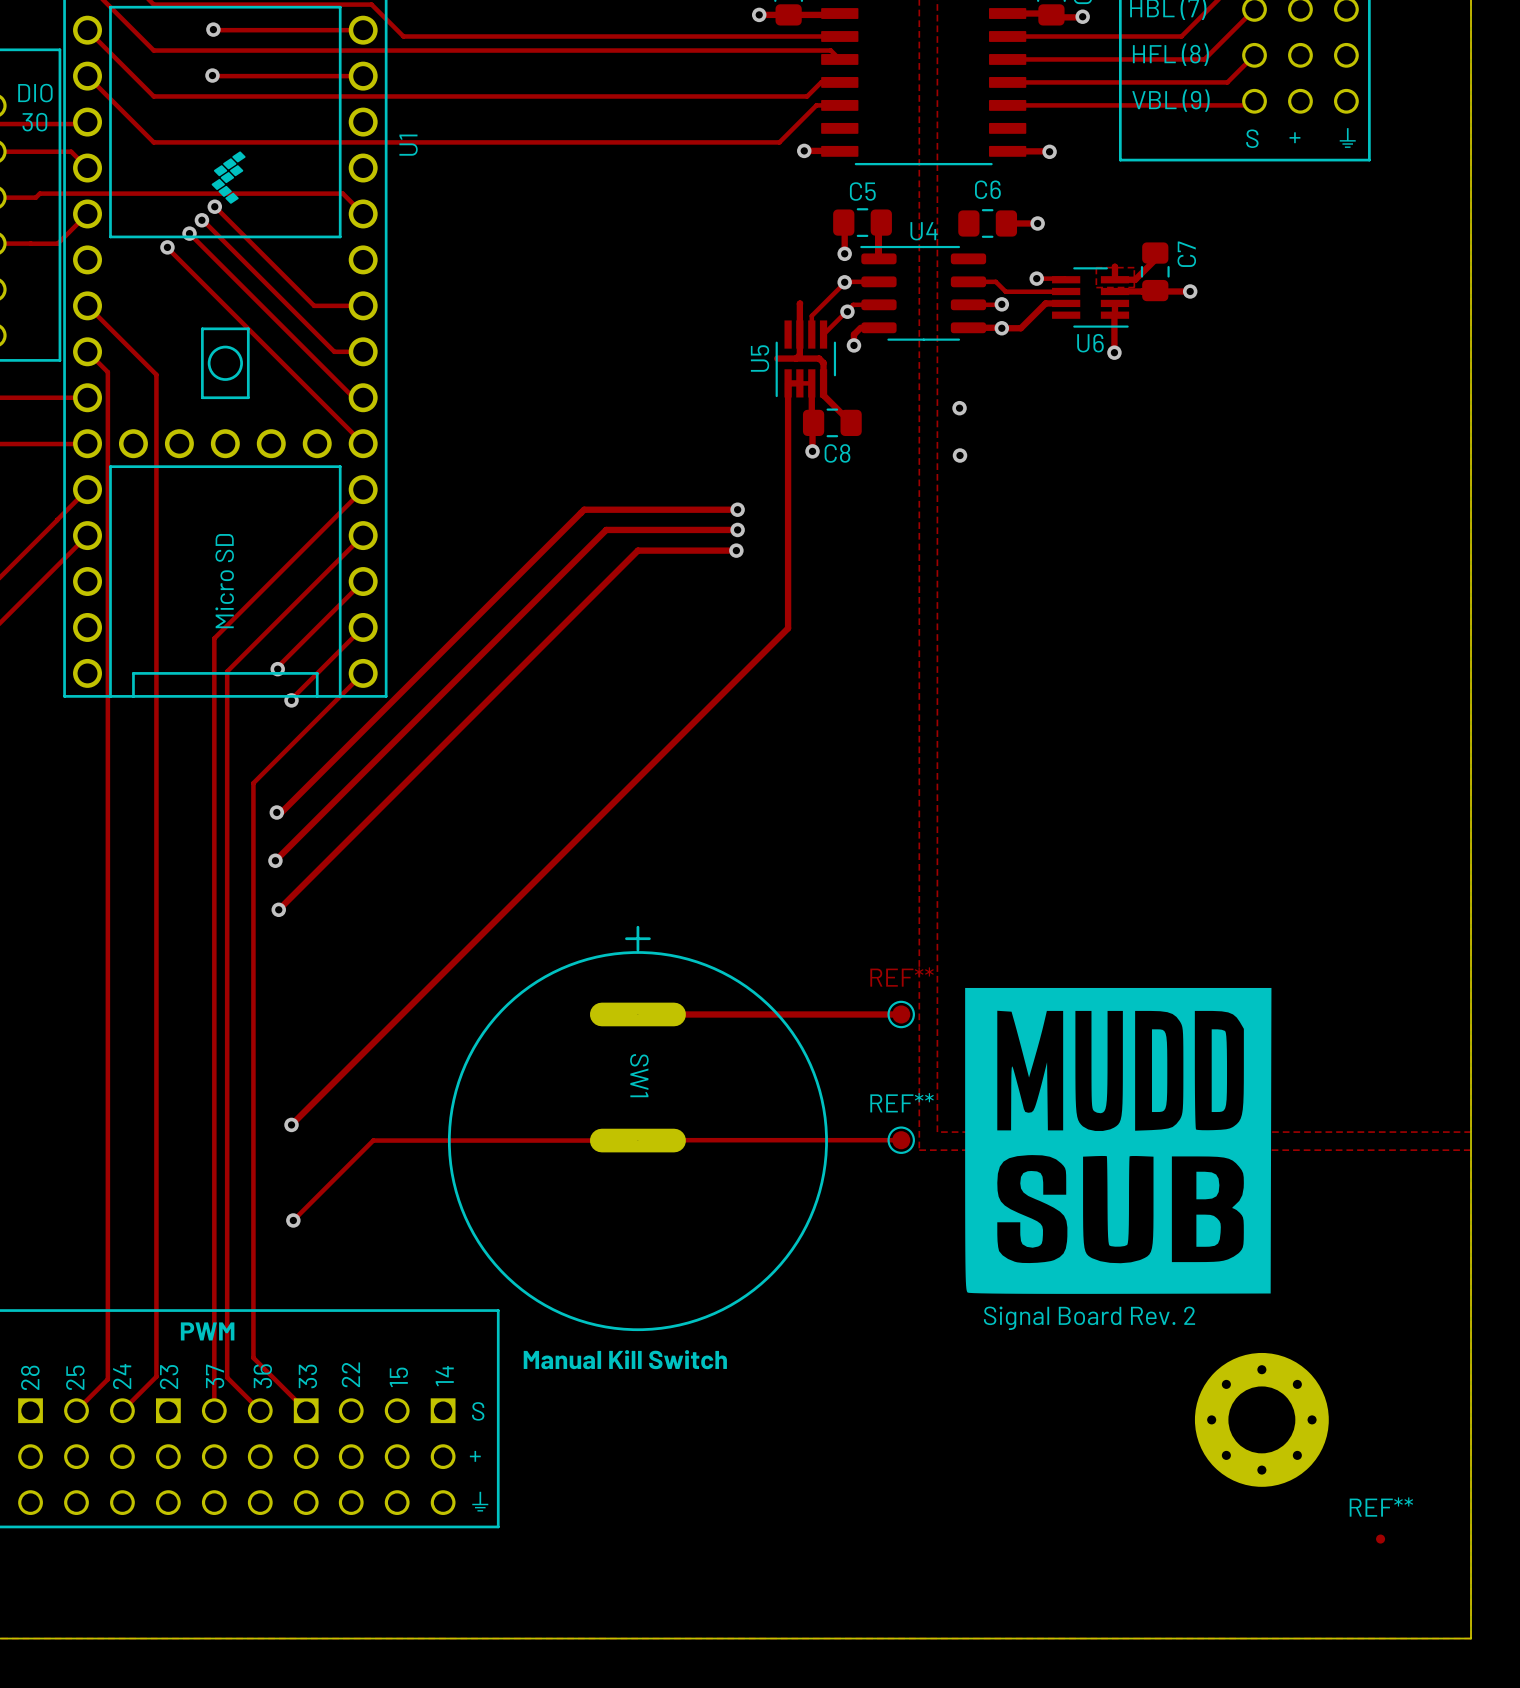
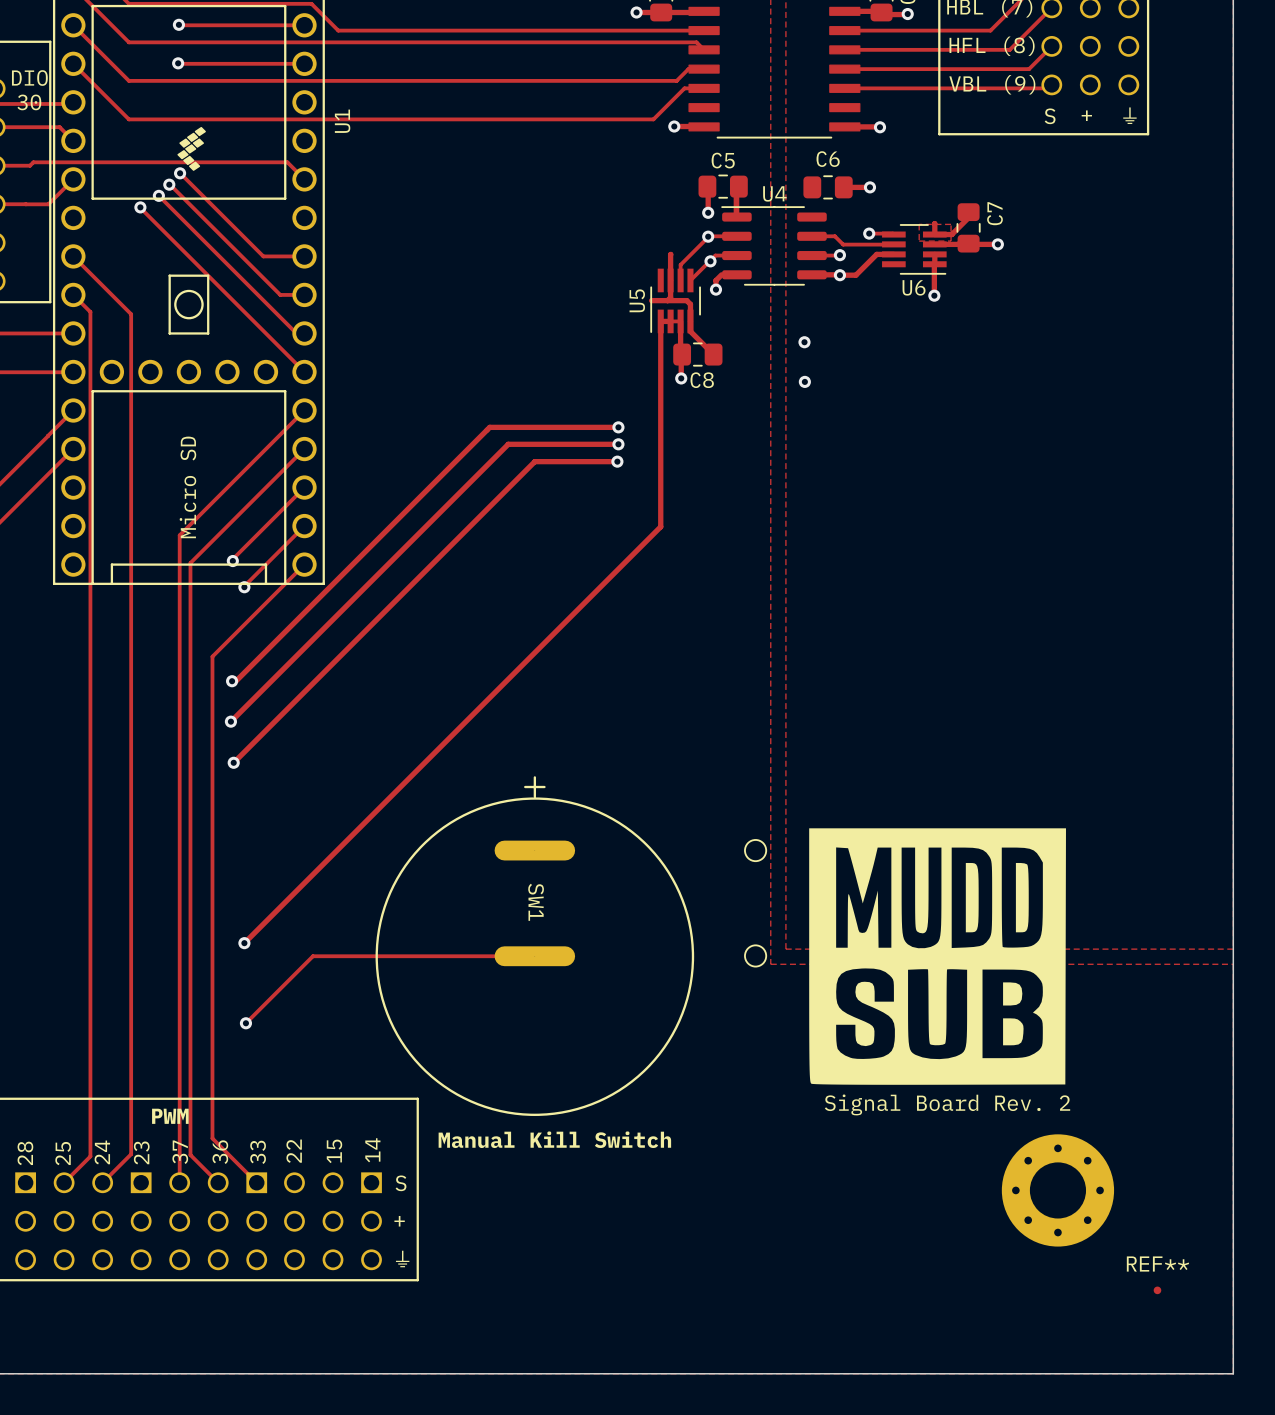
track: (637, 1014) (901, 1014) -> none
REF**: (901, 1014) -> none
part: none -> (755, 850)
track: (638, 1140) (901, 1140) -> none
REF**: (901, 1140) -> none
part: none -> (755, 955)

